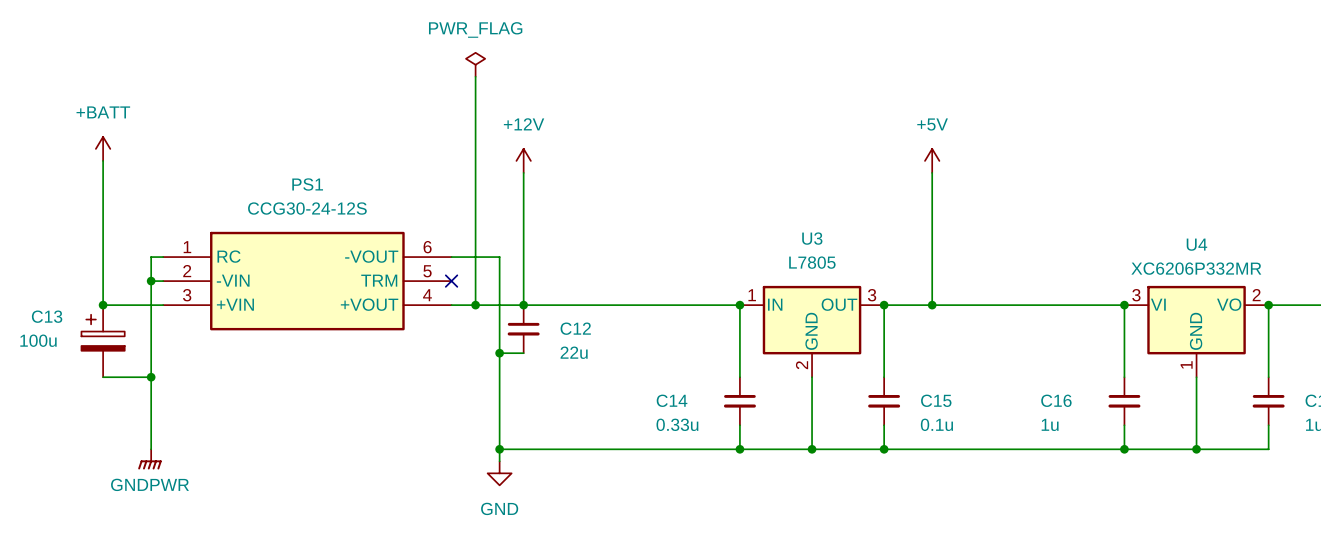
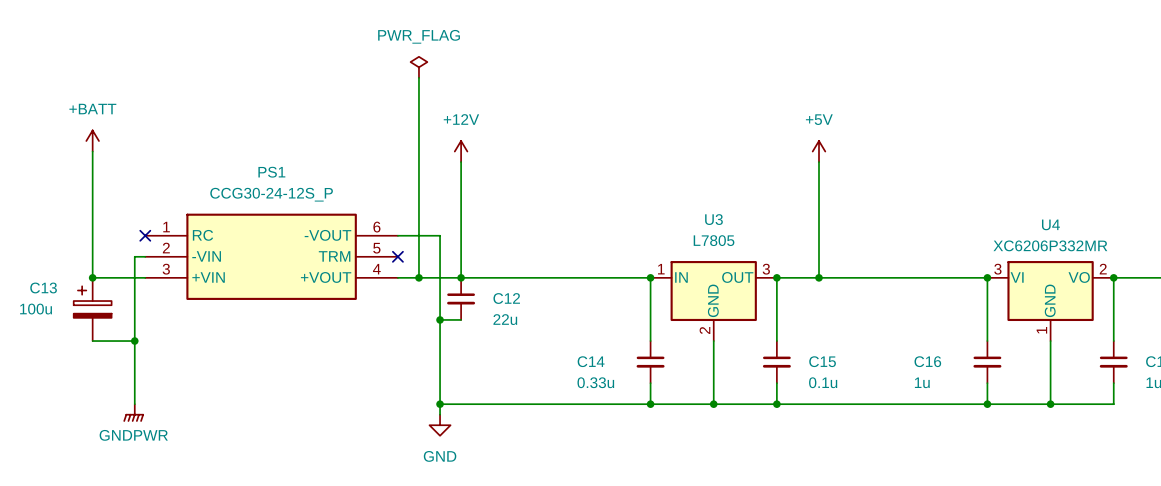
PS1 value: CCG30-24-12S (307, 208) -> CCG30-24-12S_P (271, 194)
wire: (163, 257) (151, 257) (151, 281) -> none
no-connect mark: none -> (145, 235)
junction: (151, 281) -> none

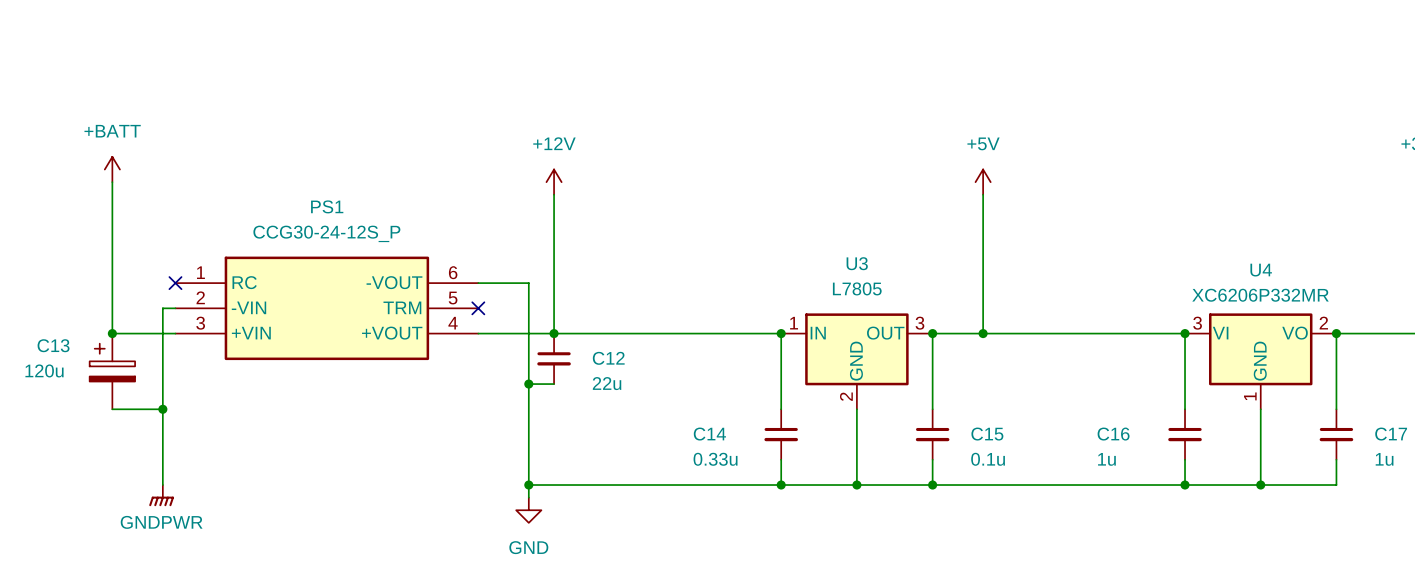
power symbol: PWR_FLAG (418, 67) -> none
wire: (418, 77) (418, 277) -> none
junction: (418, 277) -> none
C13 value: 100u (36, 309) -> 120u (44, 370)

